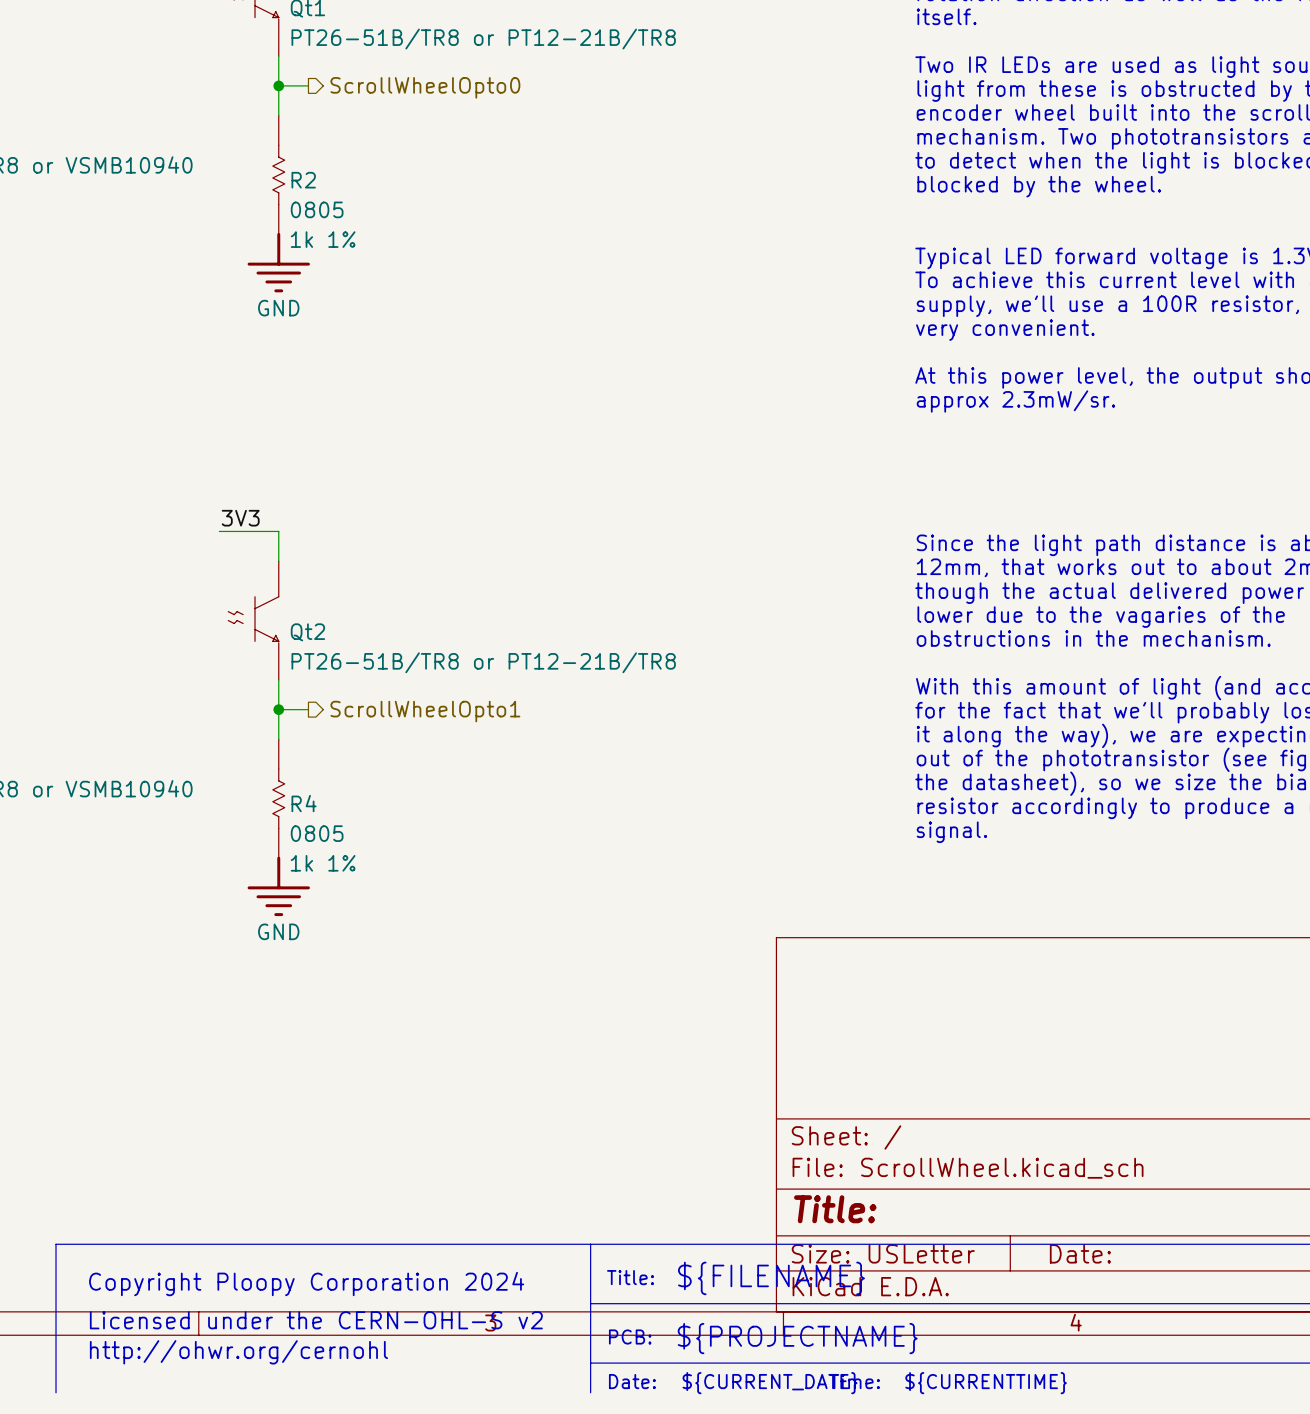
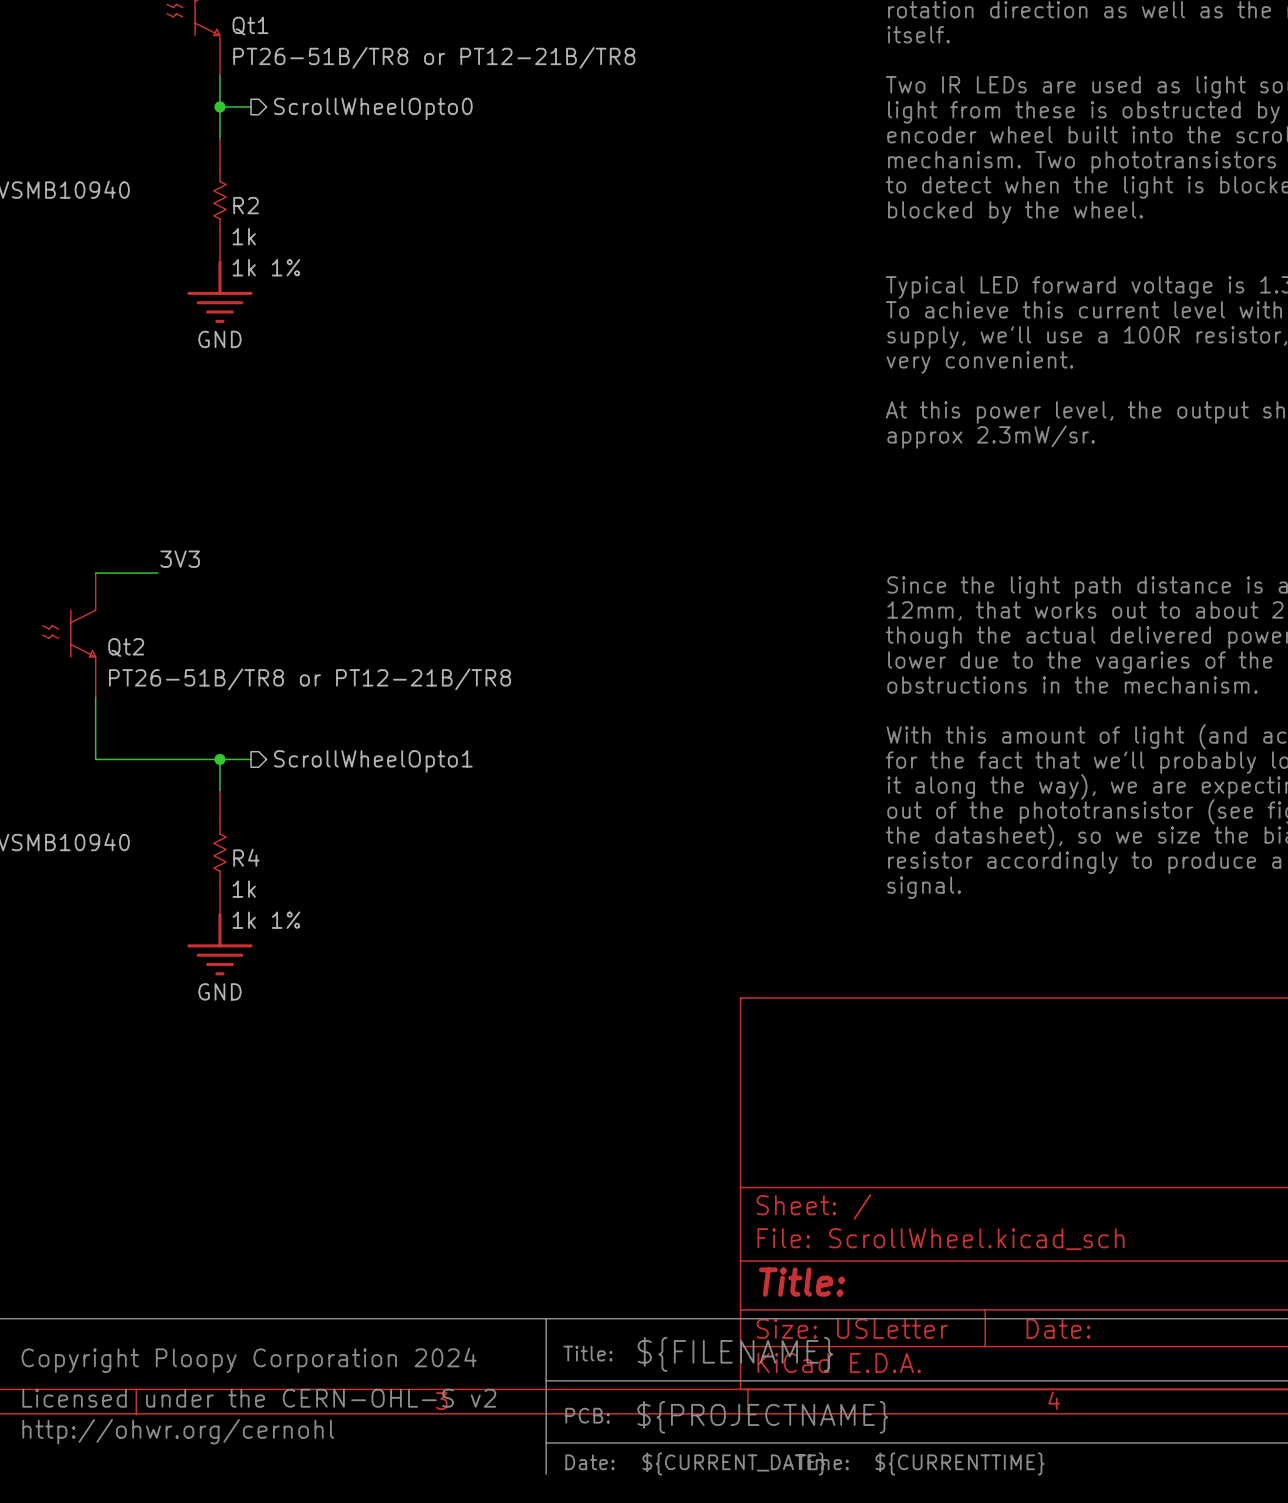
R2 value: 0805 (317, 209) -> 1k (244, 236)
wire: (219, 531) (278, 531) (278, 561) -> (157, 573) (95, 573)
Qt2 position: (253, 620) -> (69, 635)
wire: (278, 679) (278, 709) -> (95, 697) (95, 759) (219, 759)
R4 value: 0805 (317, 833) -> 1k (244, 889)

